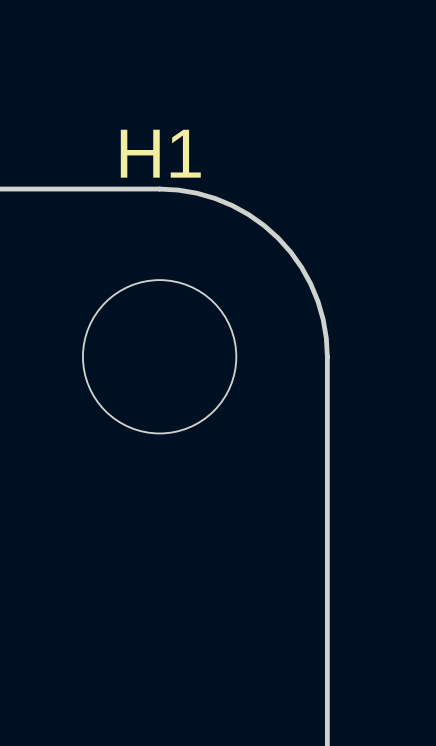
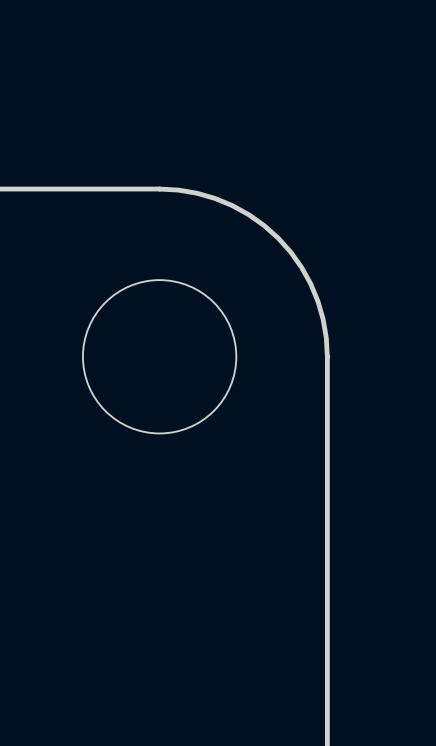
H1 name: H1 (160, 153) -> none

